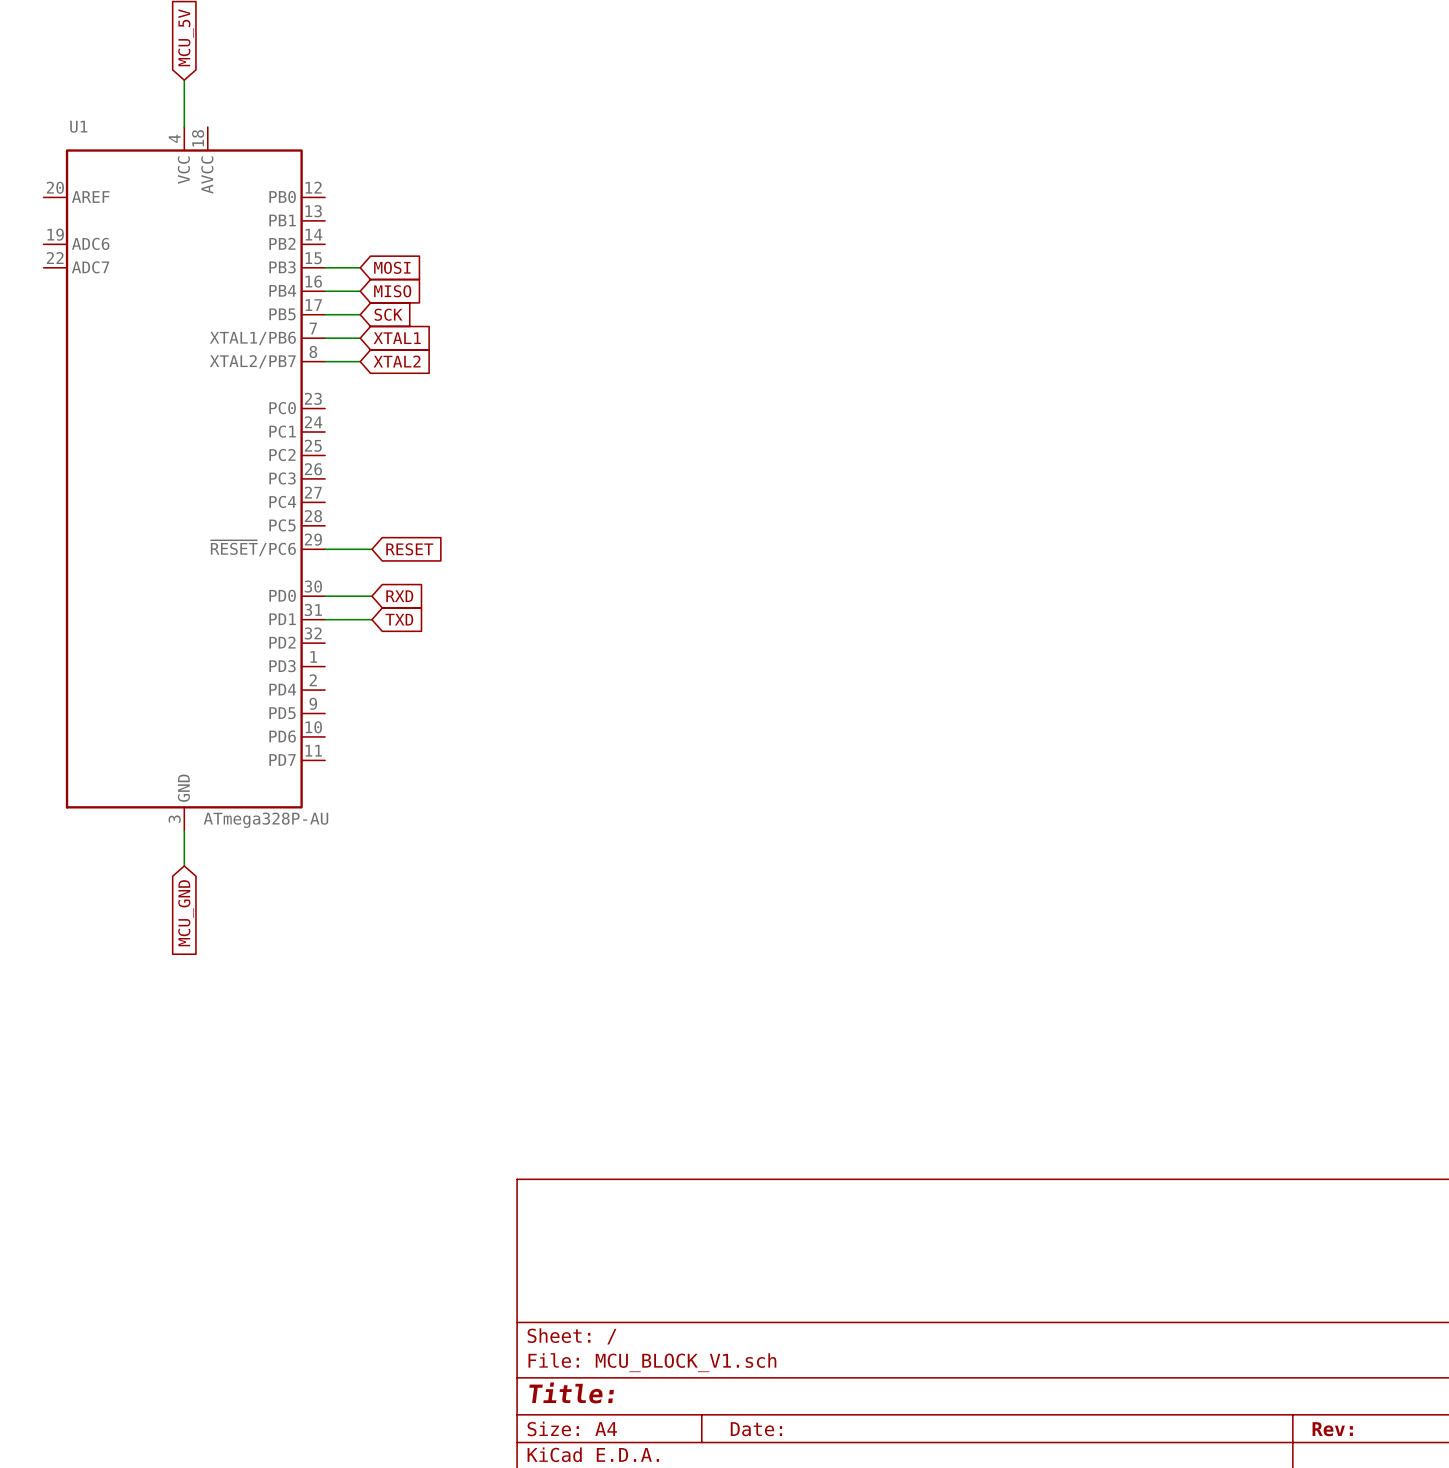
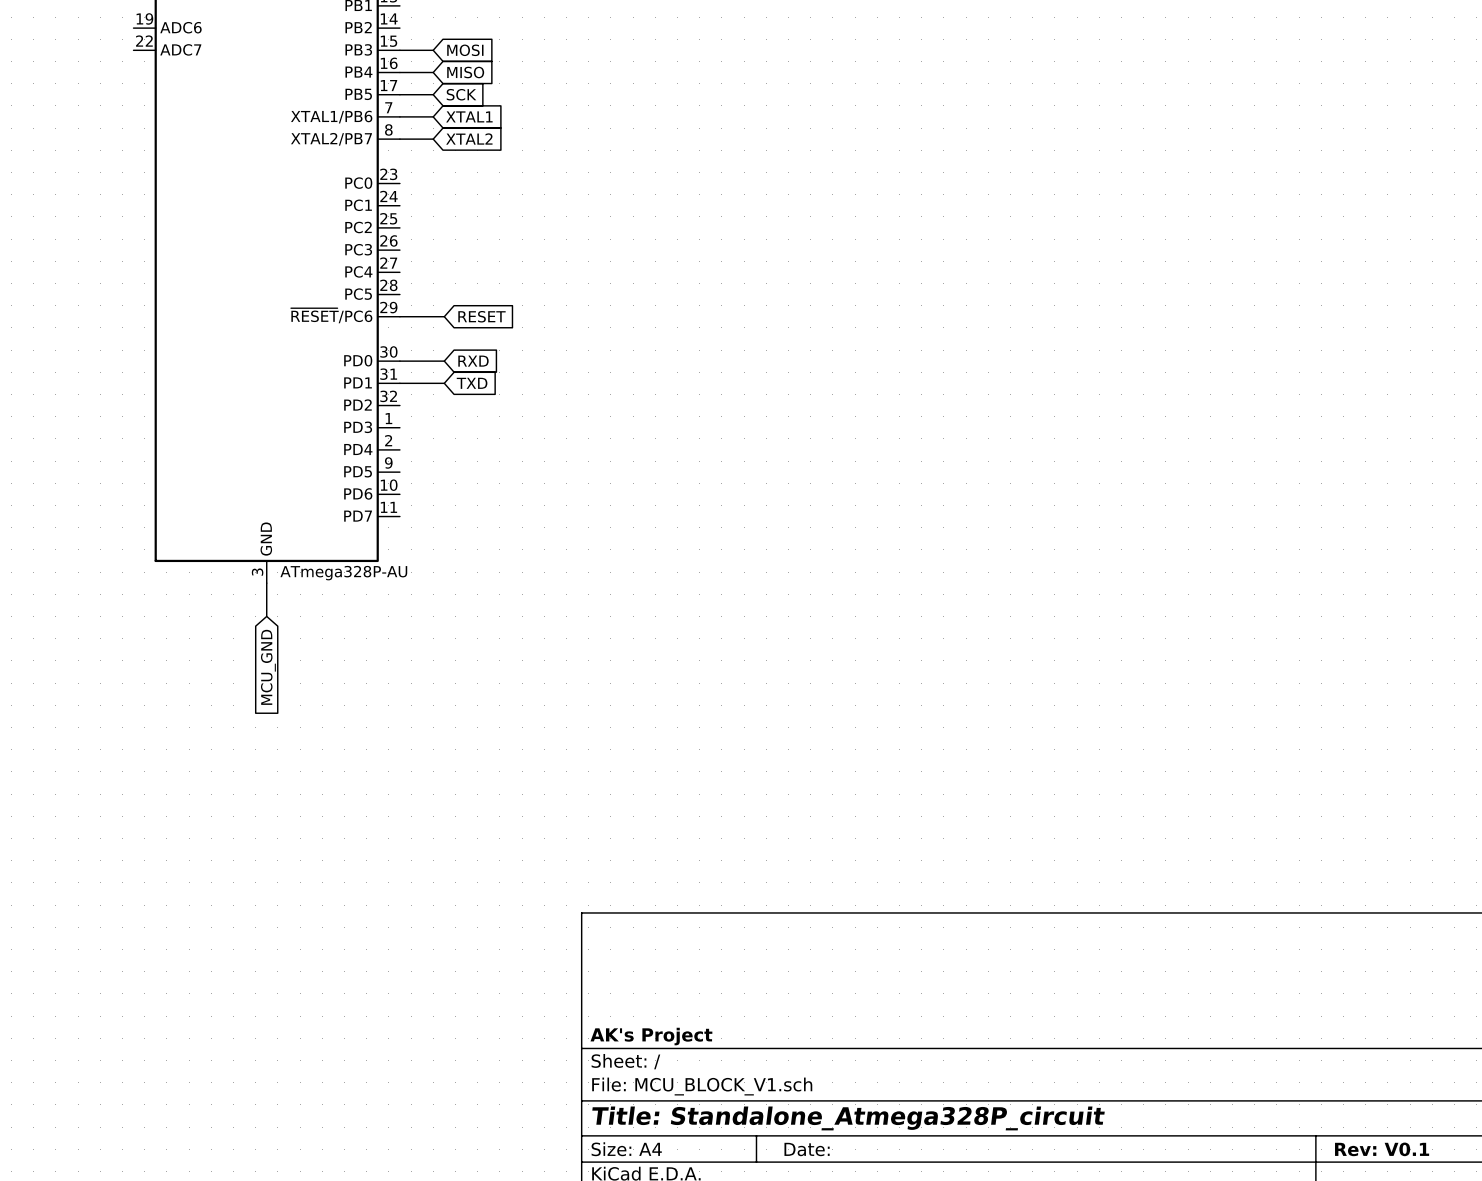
title block: none -> AK's Project (651, 1036)
title block: Title: (571, 1392) -> Title: Standalone_Atmega328P_circuit (848, 1118)
title block: Rev: (1332, 1429) -> Rev: V0.1 (1382, 1149)

